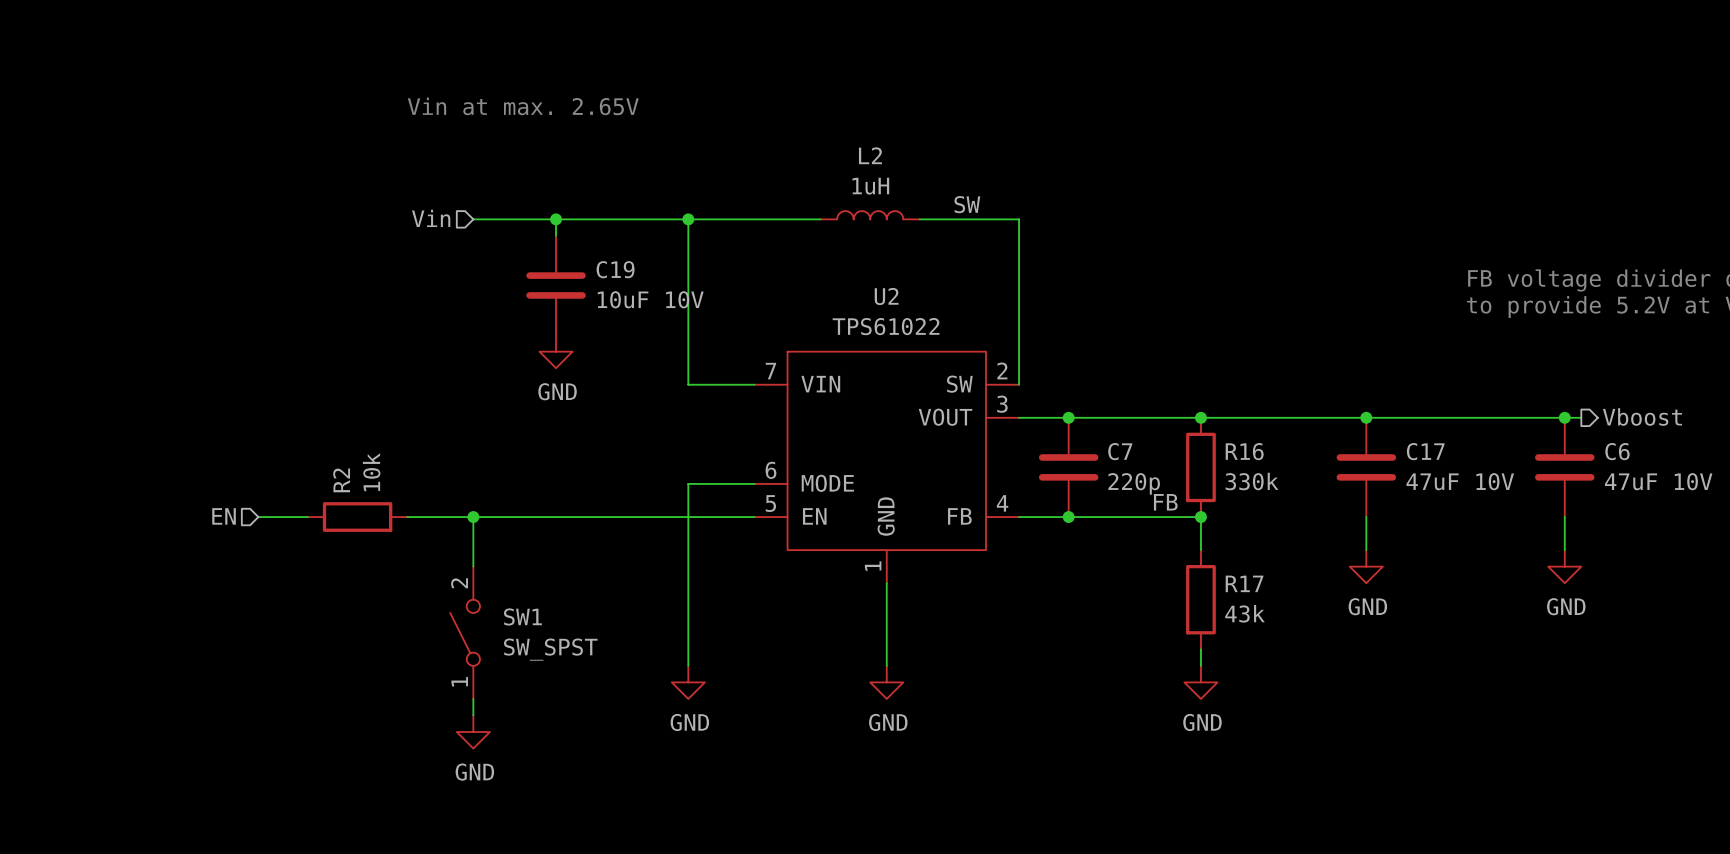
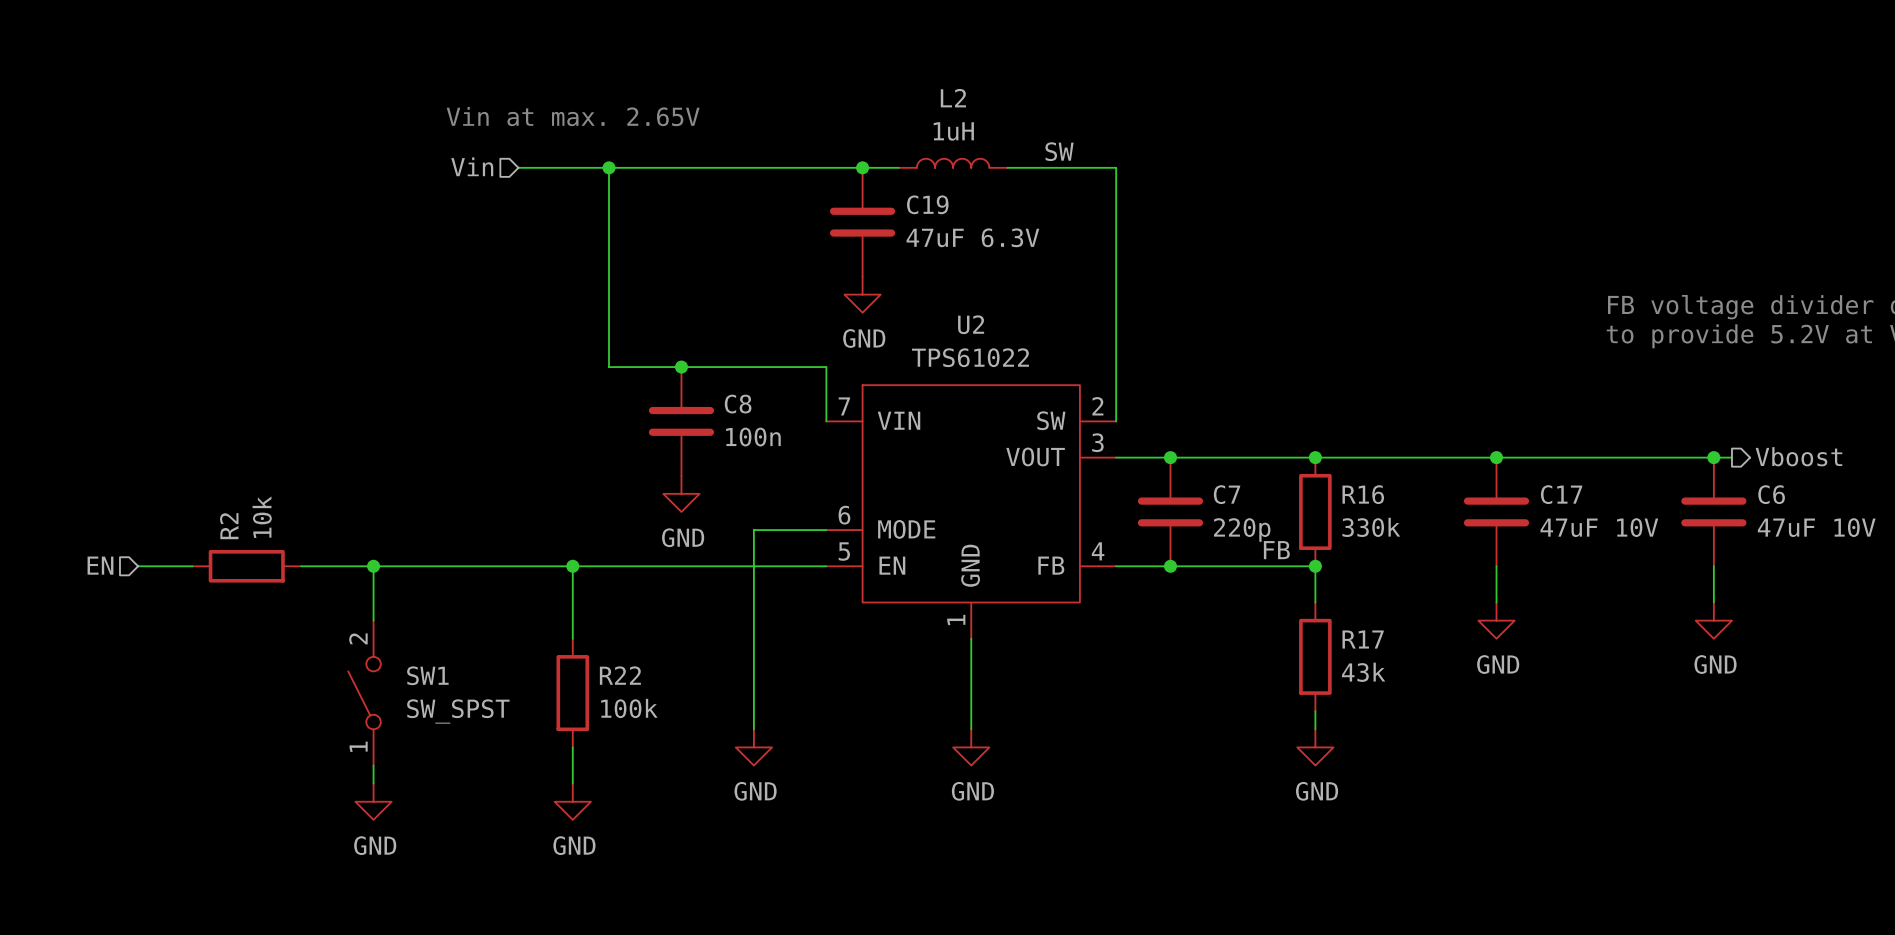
wire: none -> (609, 167) (609, 240)
junction: none -> (862, 167)
label position: SW (967, 204) -> SW (1059, 151)
L2 position: (870, 215) -> (953, 163)
hierarchical label position: Vin (431, 218) -> Vin (472, 166)
wire: (473, 219) (820, 219) -> (518, 167) (898, 167)
junction position: (556, 219) -> (609, 167)
wire: (688, 219) (688, 384) (754, 384) -> (609, 258) (609, 367) (826, 367) (826, 421)
junction: (688, 219) -> none
wire: (919, 219) (1019, 219) -> (1007, 167) (1116, 167) (1116, 240)
power symbol: none -> GND (862, 294)
C19 position: (556, 285) -> (862, 222)
C19 value: 10uF 10V (650, 299) -> 47uF 6.3V (972, 237)
junction: none -> (681, 367)
power symbol position: GND (556, 351) -> GND (681, 493)
C8: none -> 100n (681, 421)
hierarchical label position: EN (224, 516) -> EN (100, 565)
wire: none -> (138, 566) (192, 566)
wire: none -> (337, 566) (446, 566)
junction: none -> (373, 566)
R2 position: (357, 517) -> (246, 566)
wire: (473, 517) (473, 566) -> (373, 566) (373, 620)
junction position: (473, 517) -> (572, 566)
wire: none -> (572, 566) (572, 638)
SW1 position: (465, 632) -> (364, 693)
R22: none -> 100k (572, 693)
wire: none -> (572, 747) (572, 783)
wire: (473, 698) (473, 715) -> (373, 765) (373, 783)
power symbol: none -> GND (373, 801)
power symbol position: GND (473, 732) -> GND (572, 801)

